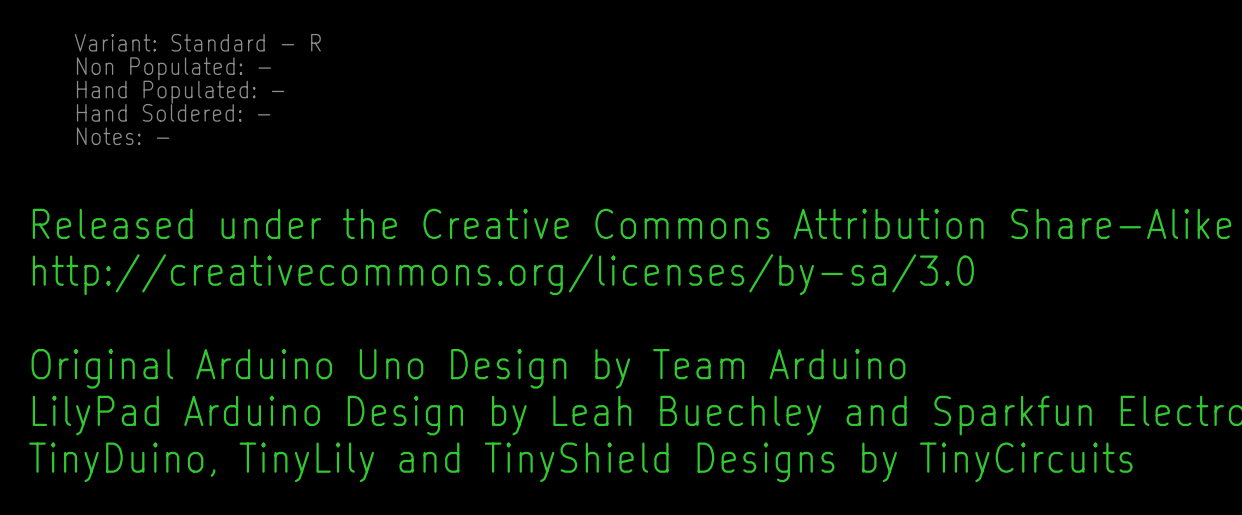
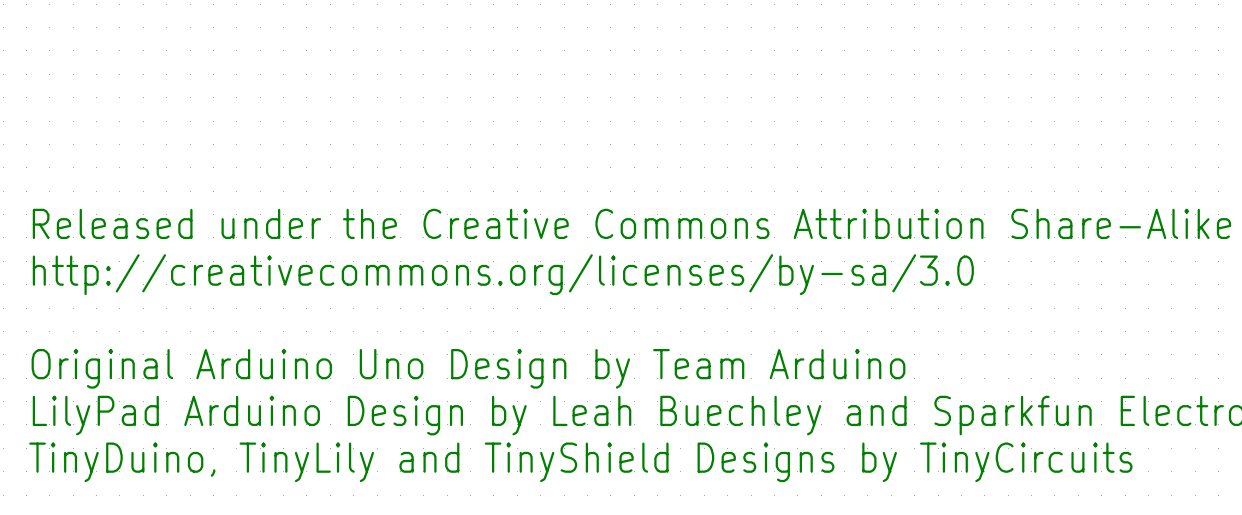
text: Variant: Standard - R (197, 42) -> none
text: Non Populated: - (173, 68) -> none
text: Hand Populated: - (180, 92) -> none
text: Hand Soldered: - (173, 112) -> none
text: Notes: - (123, 136) -> none

